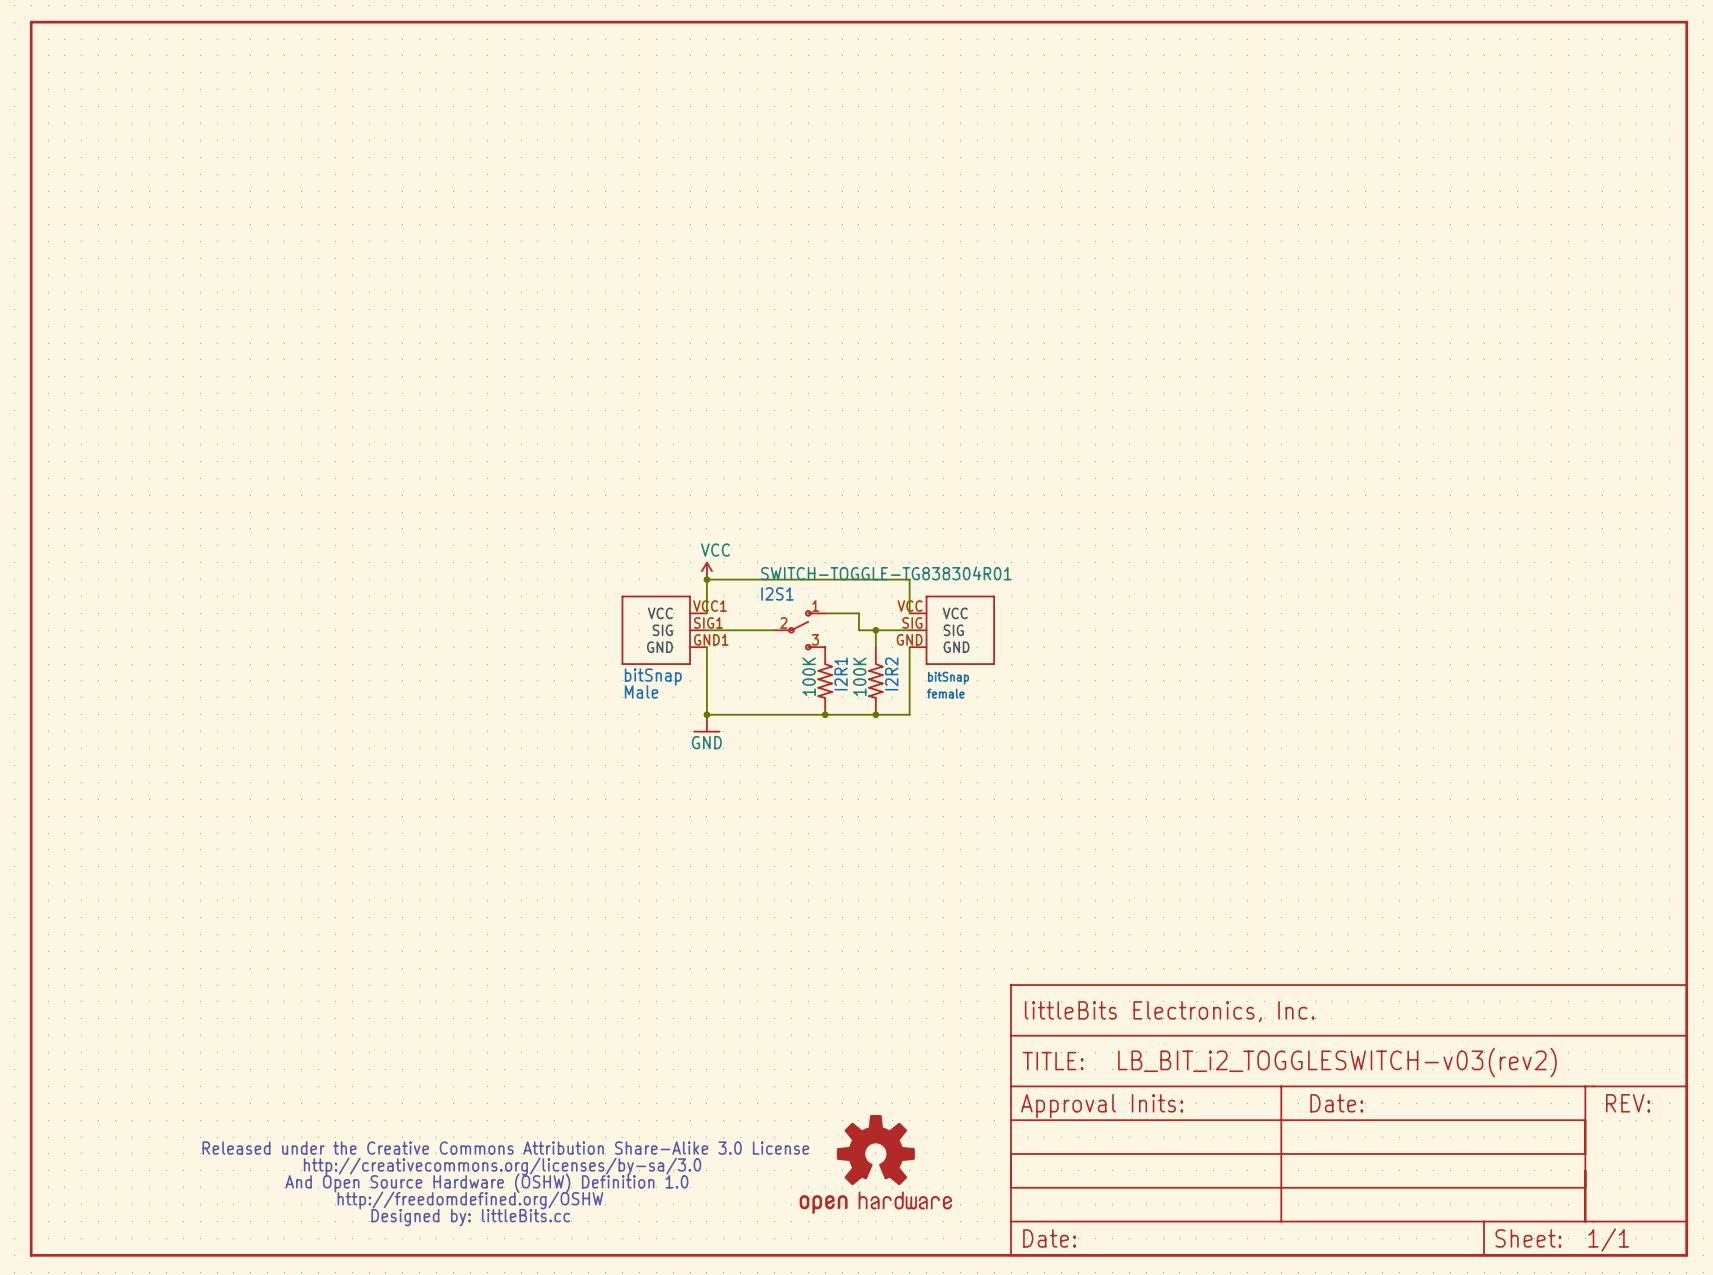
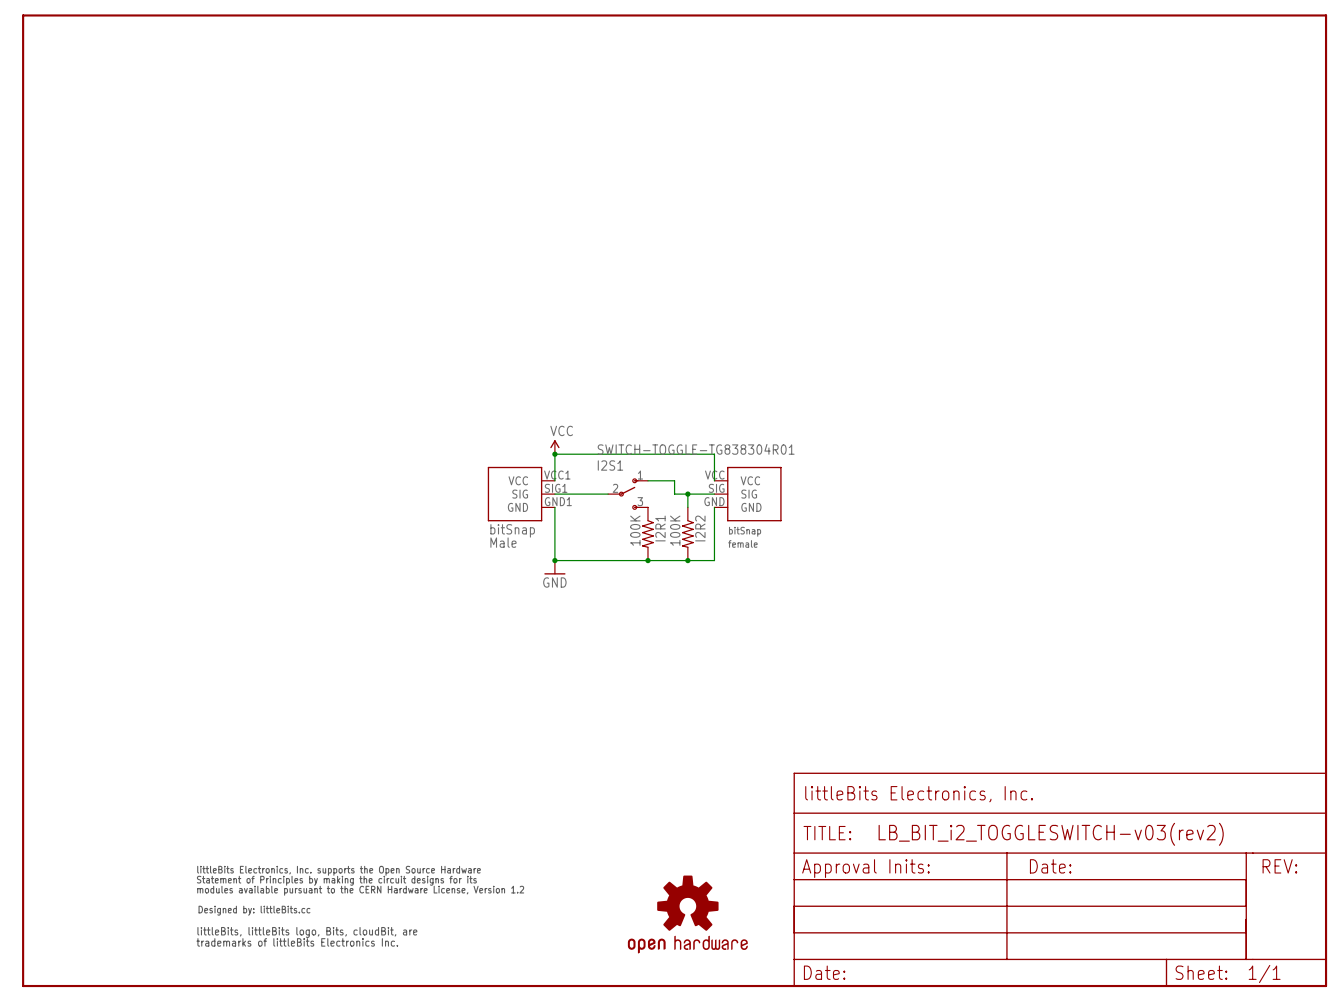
part: none -> (360, 906)
part: (505, 1183) -> none

